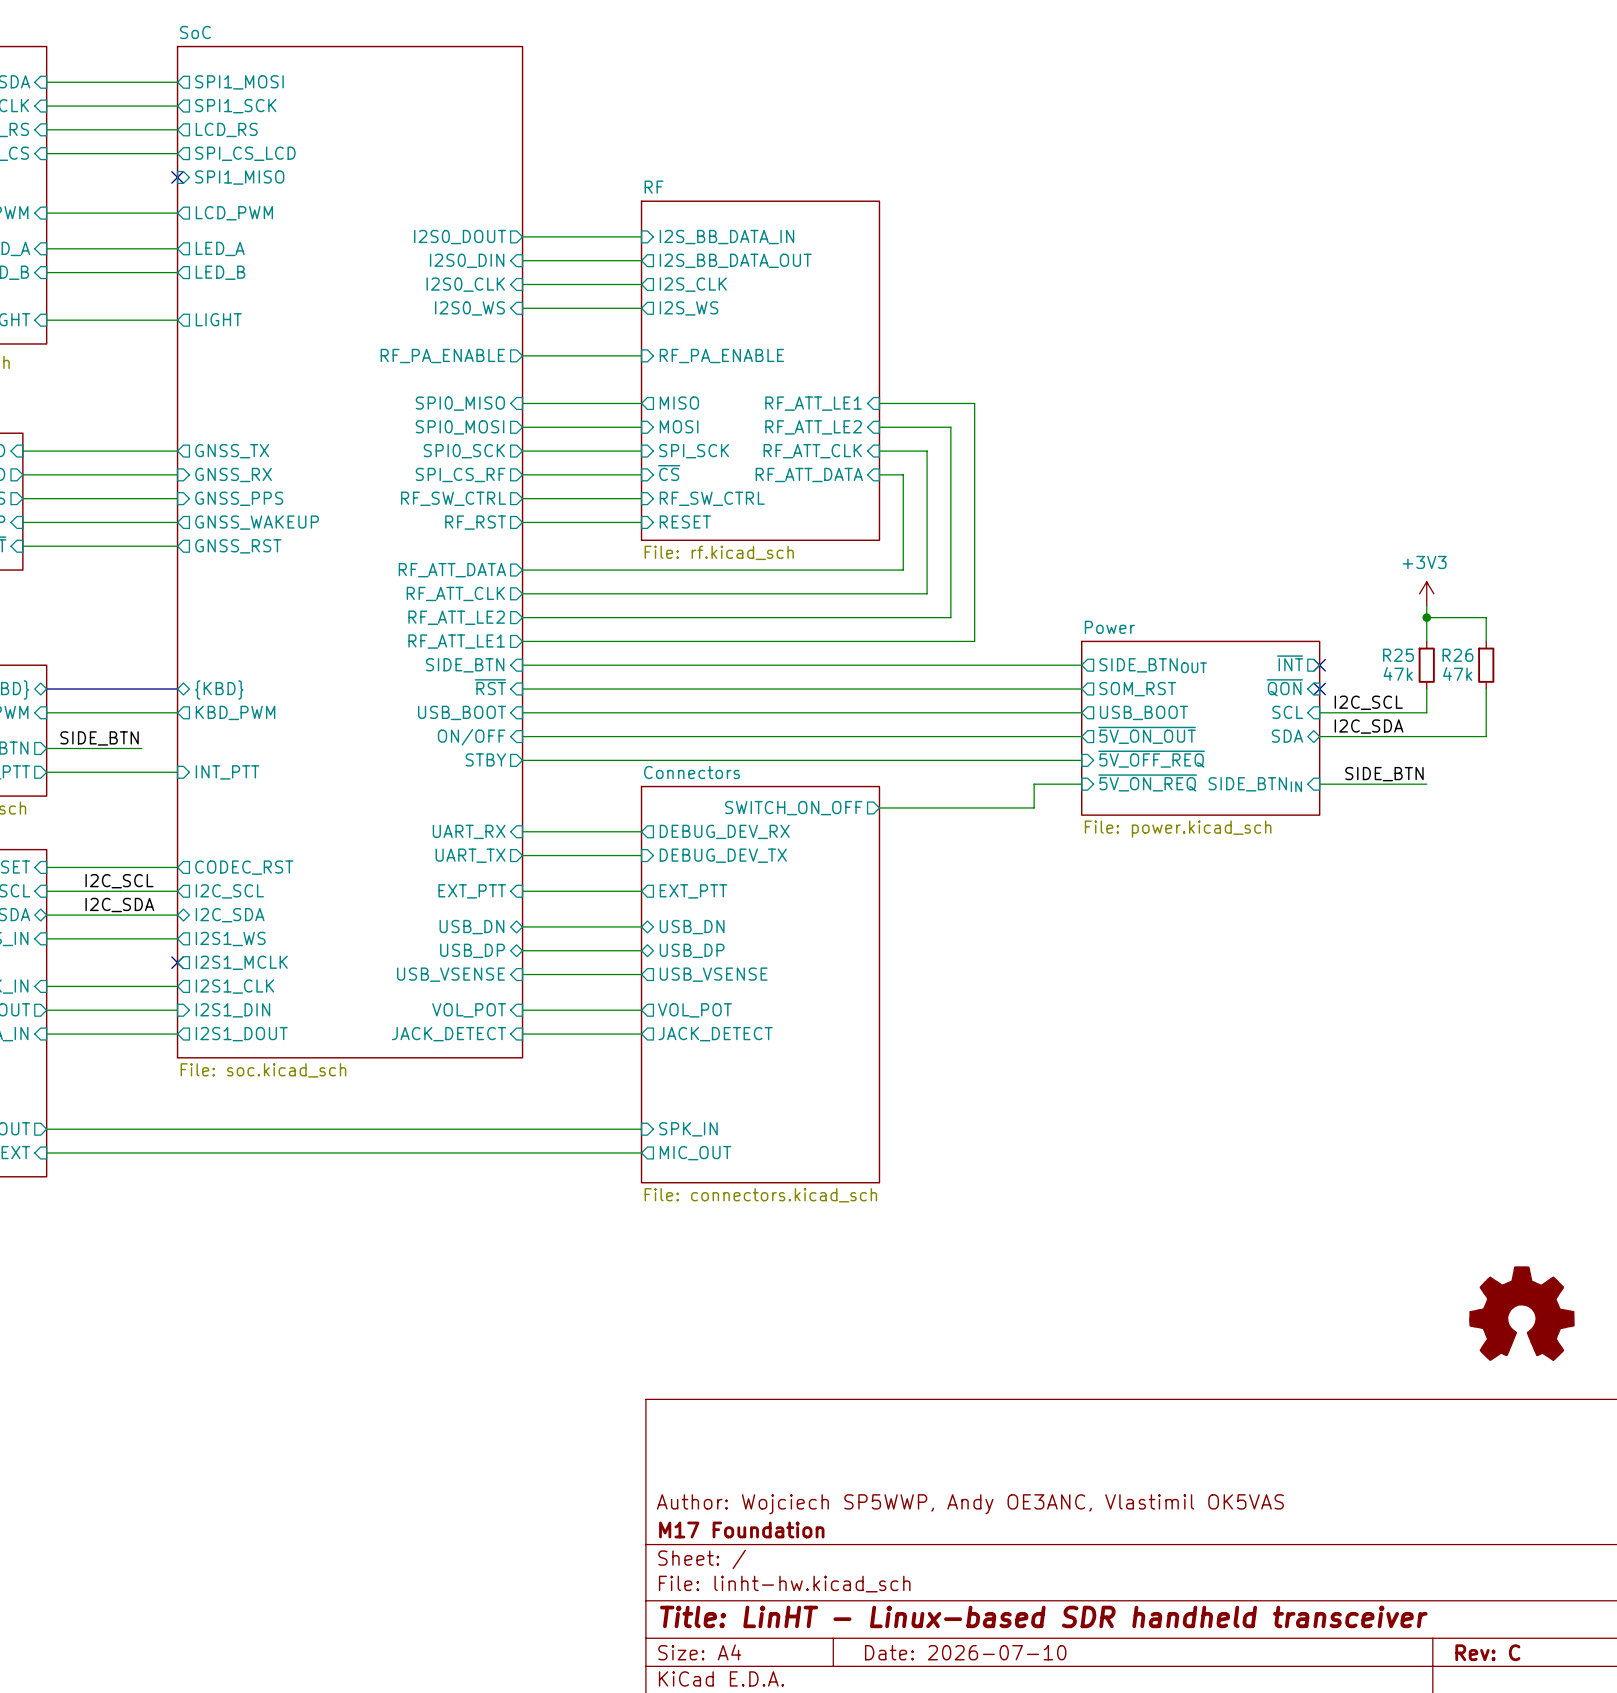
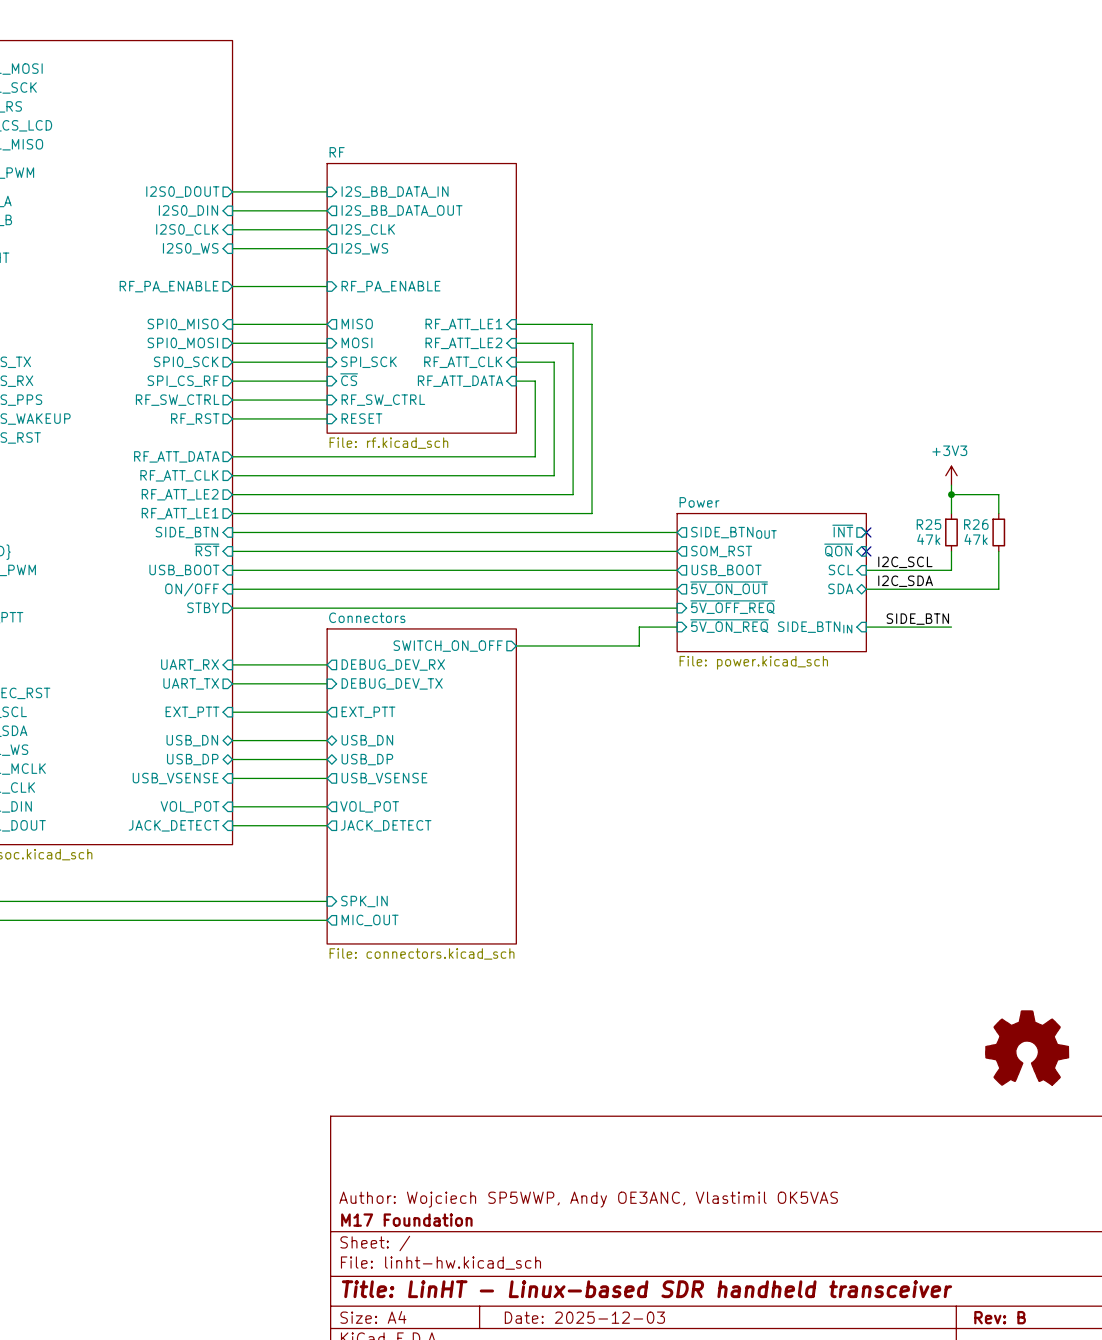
title block: Date: 2026-07-10 (965, 1652) -> Date: 2025-12-03 (584, 1317)
title block: Rev: C (1487, 1652) -> Rev: B (1000, 1317)

